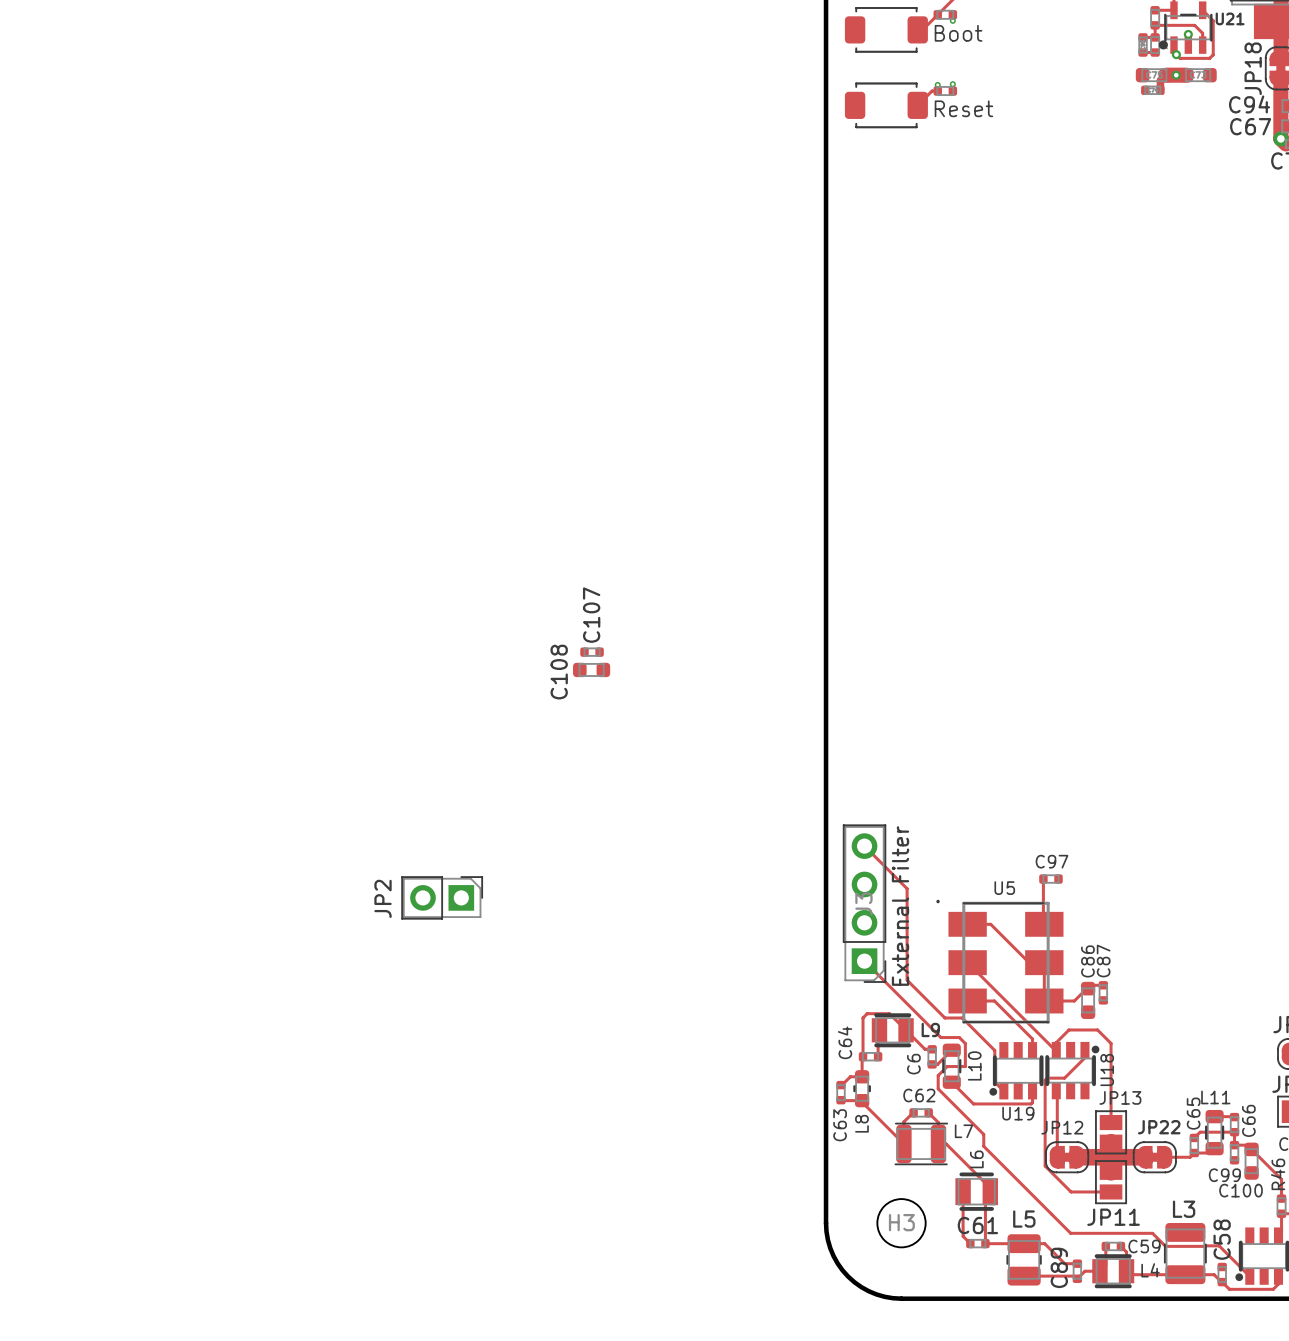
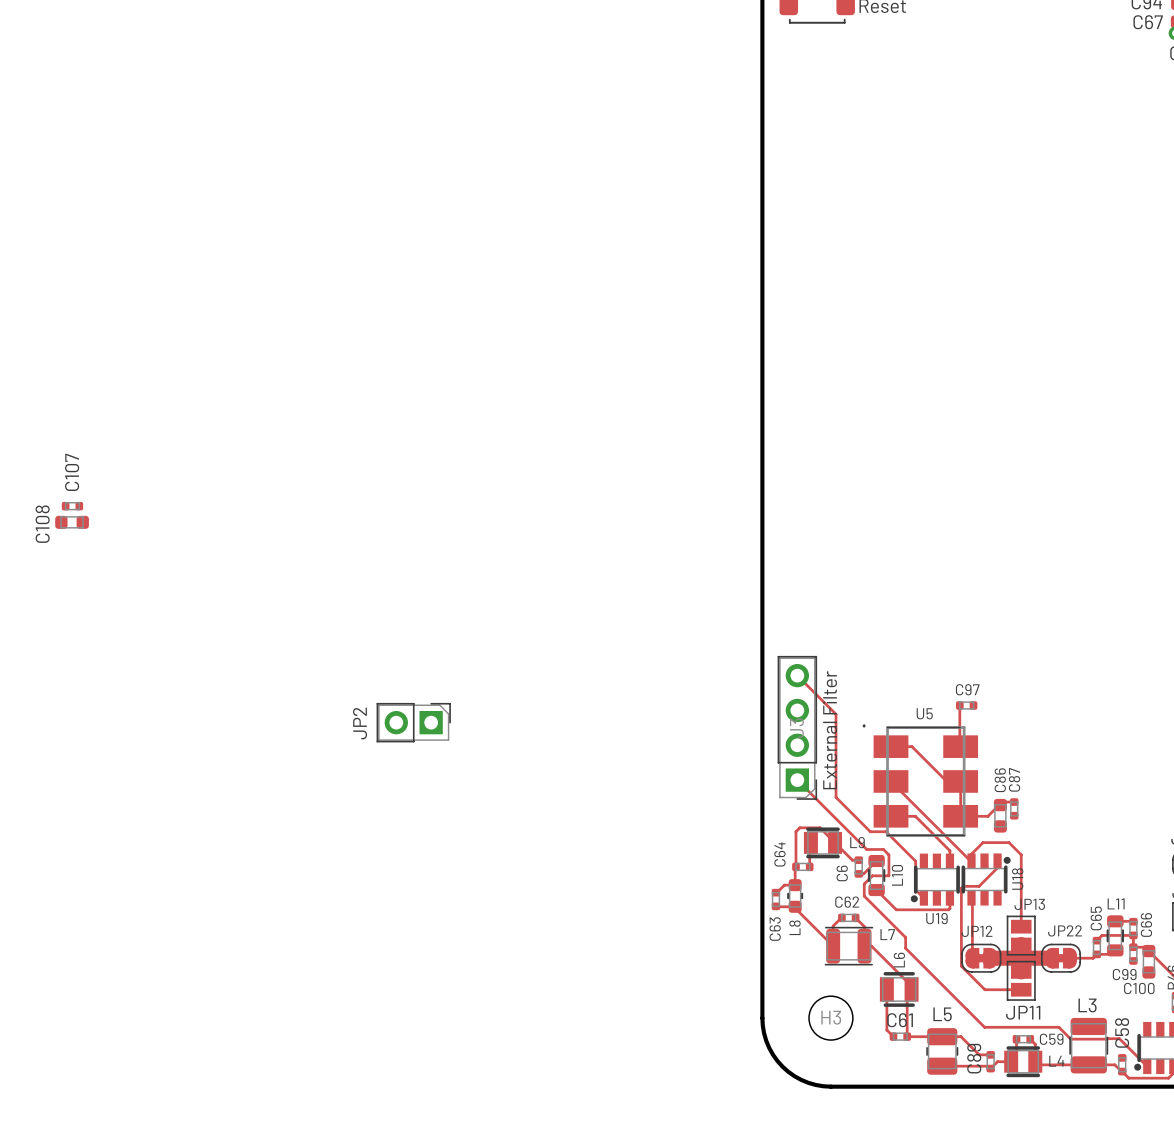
C107 position: (592, 652) -> (72, 506)
C108 position: (591, 669) -> (72, 522)

